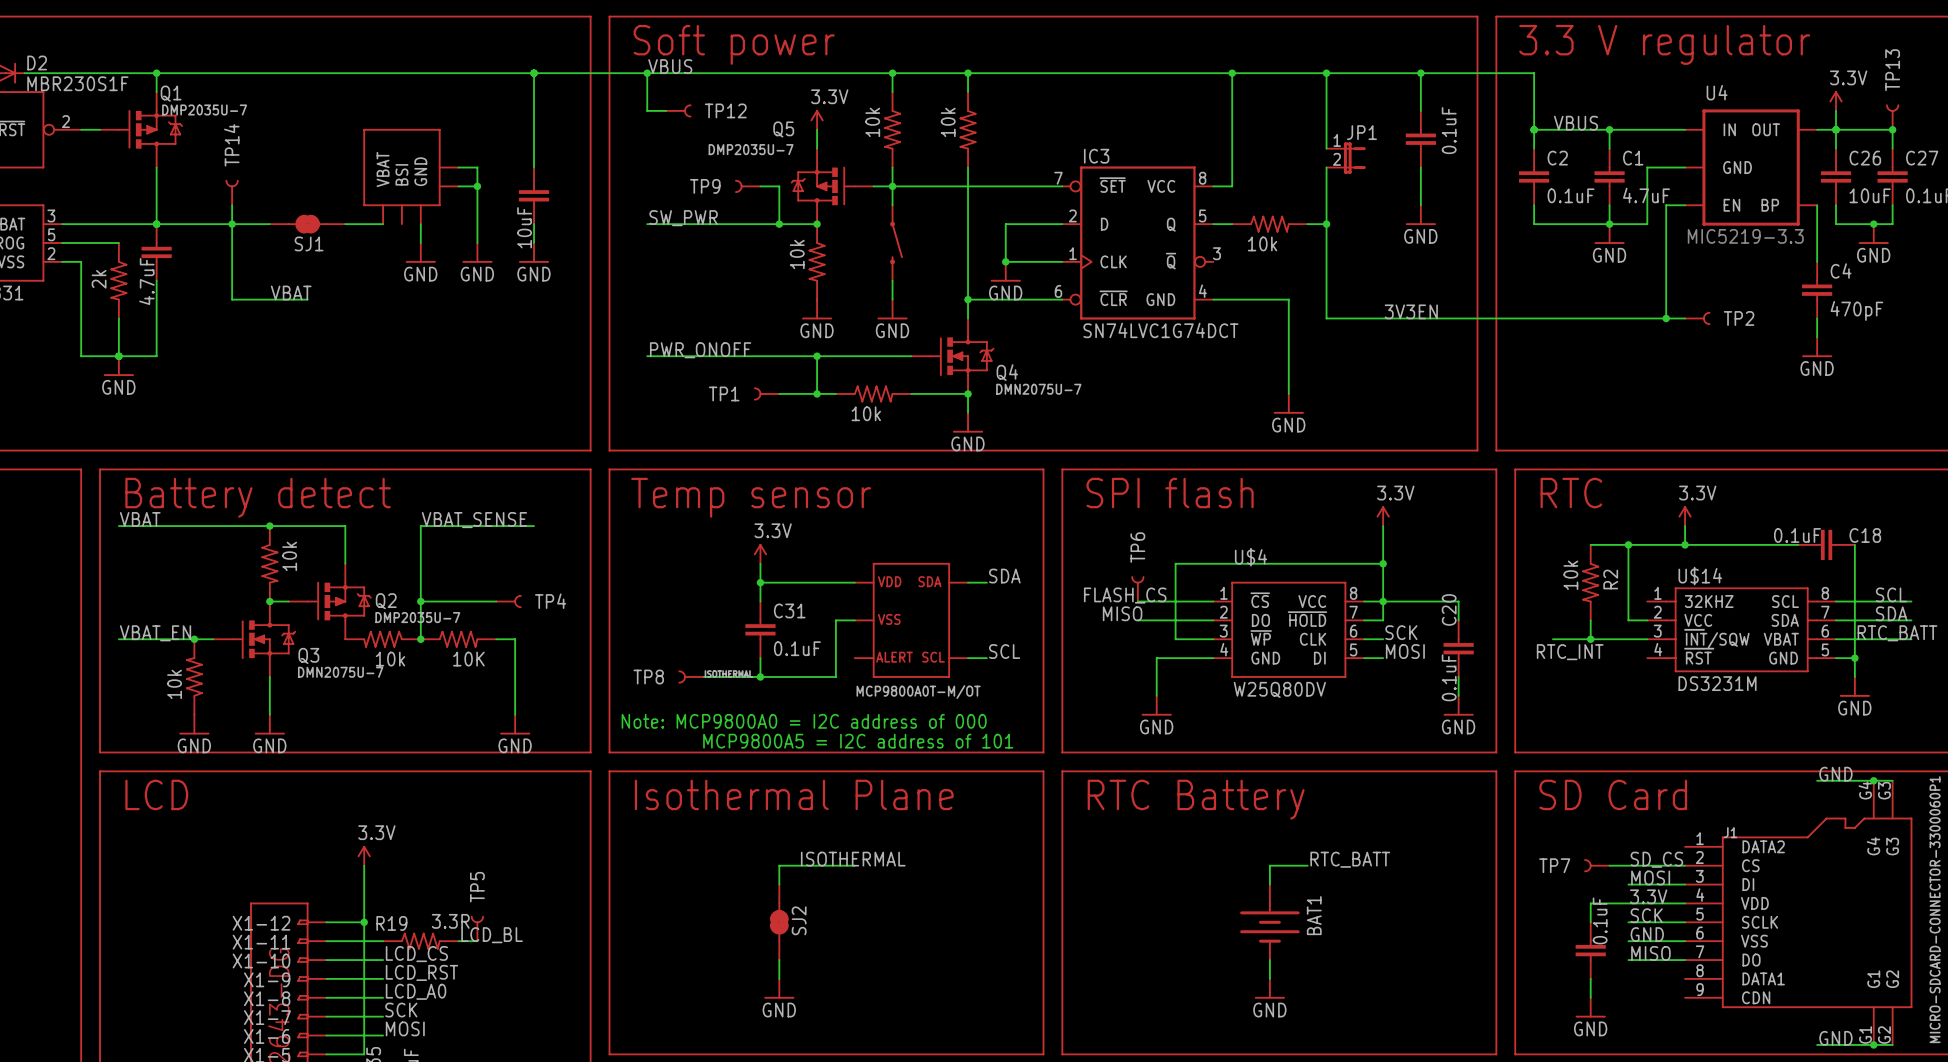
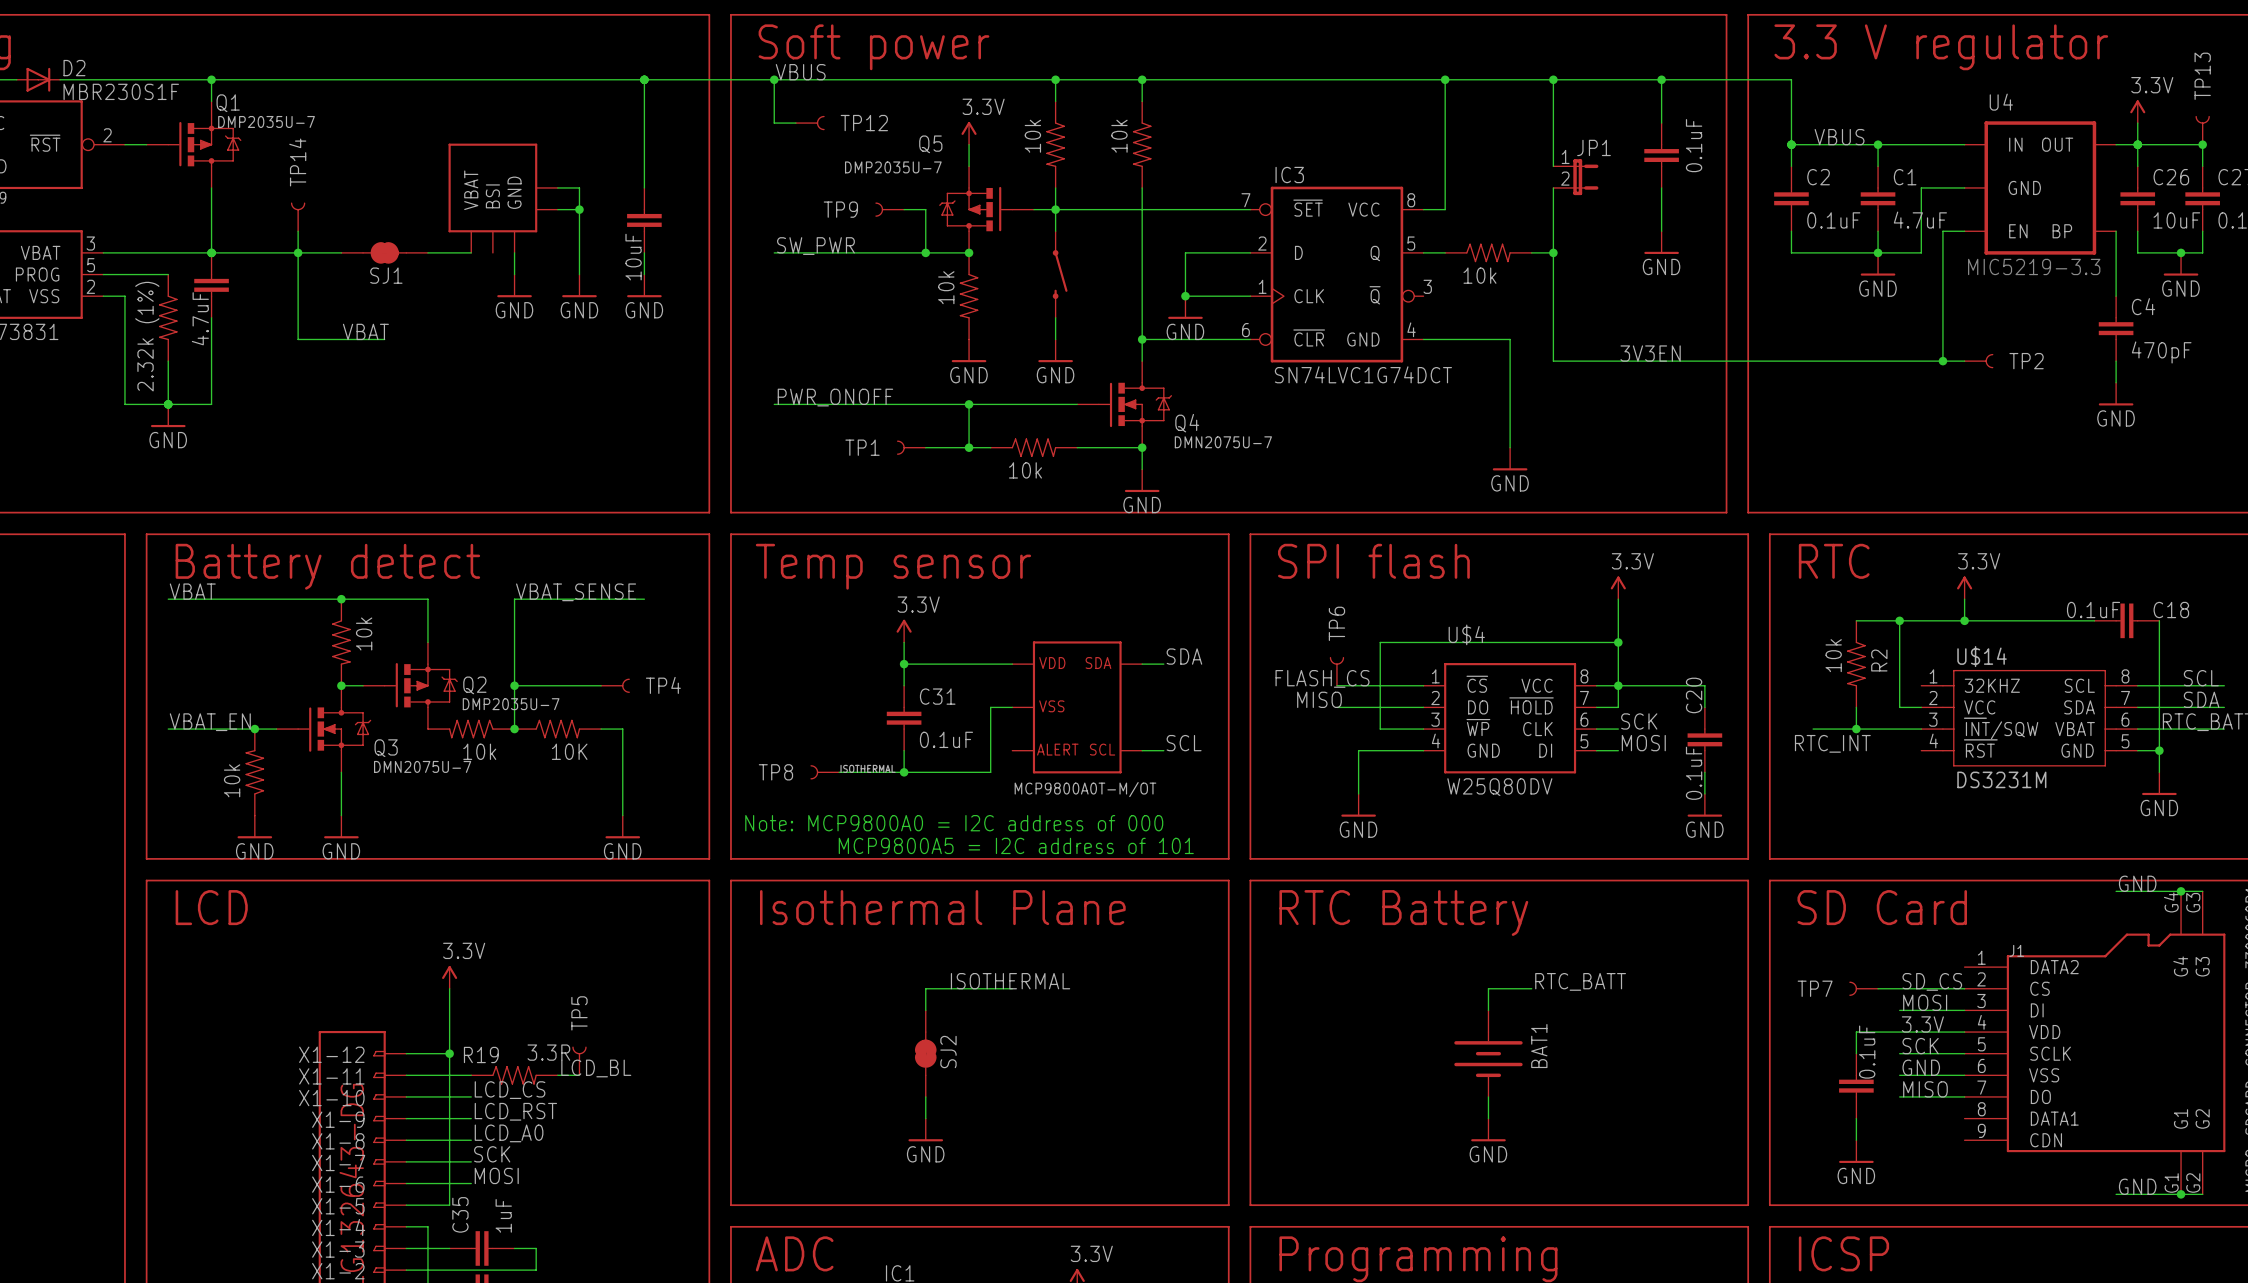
part value: 2k (99, 279) -> 2.32k (1%) (147, 336)

